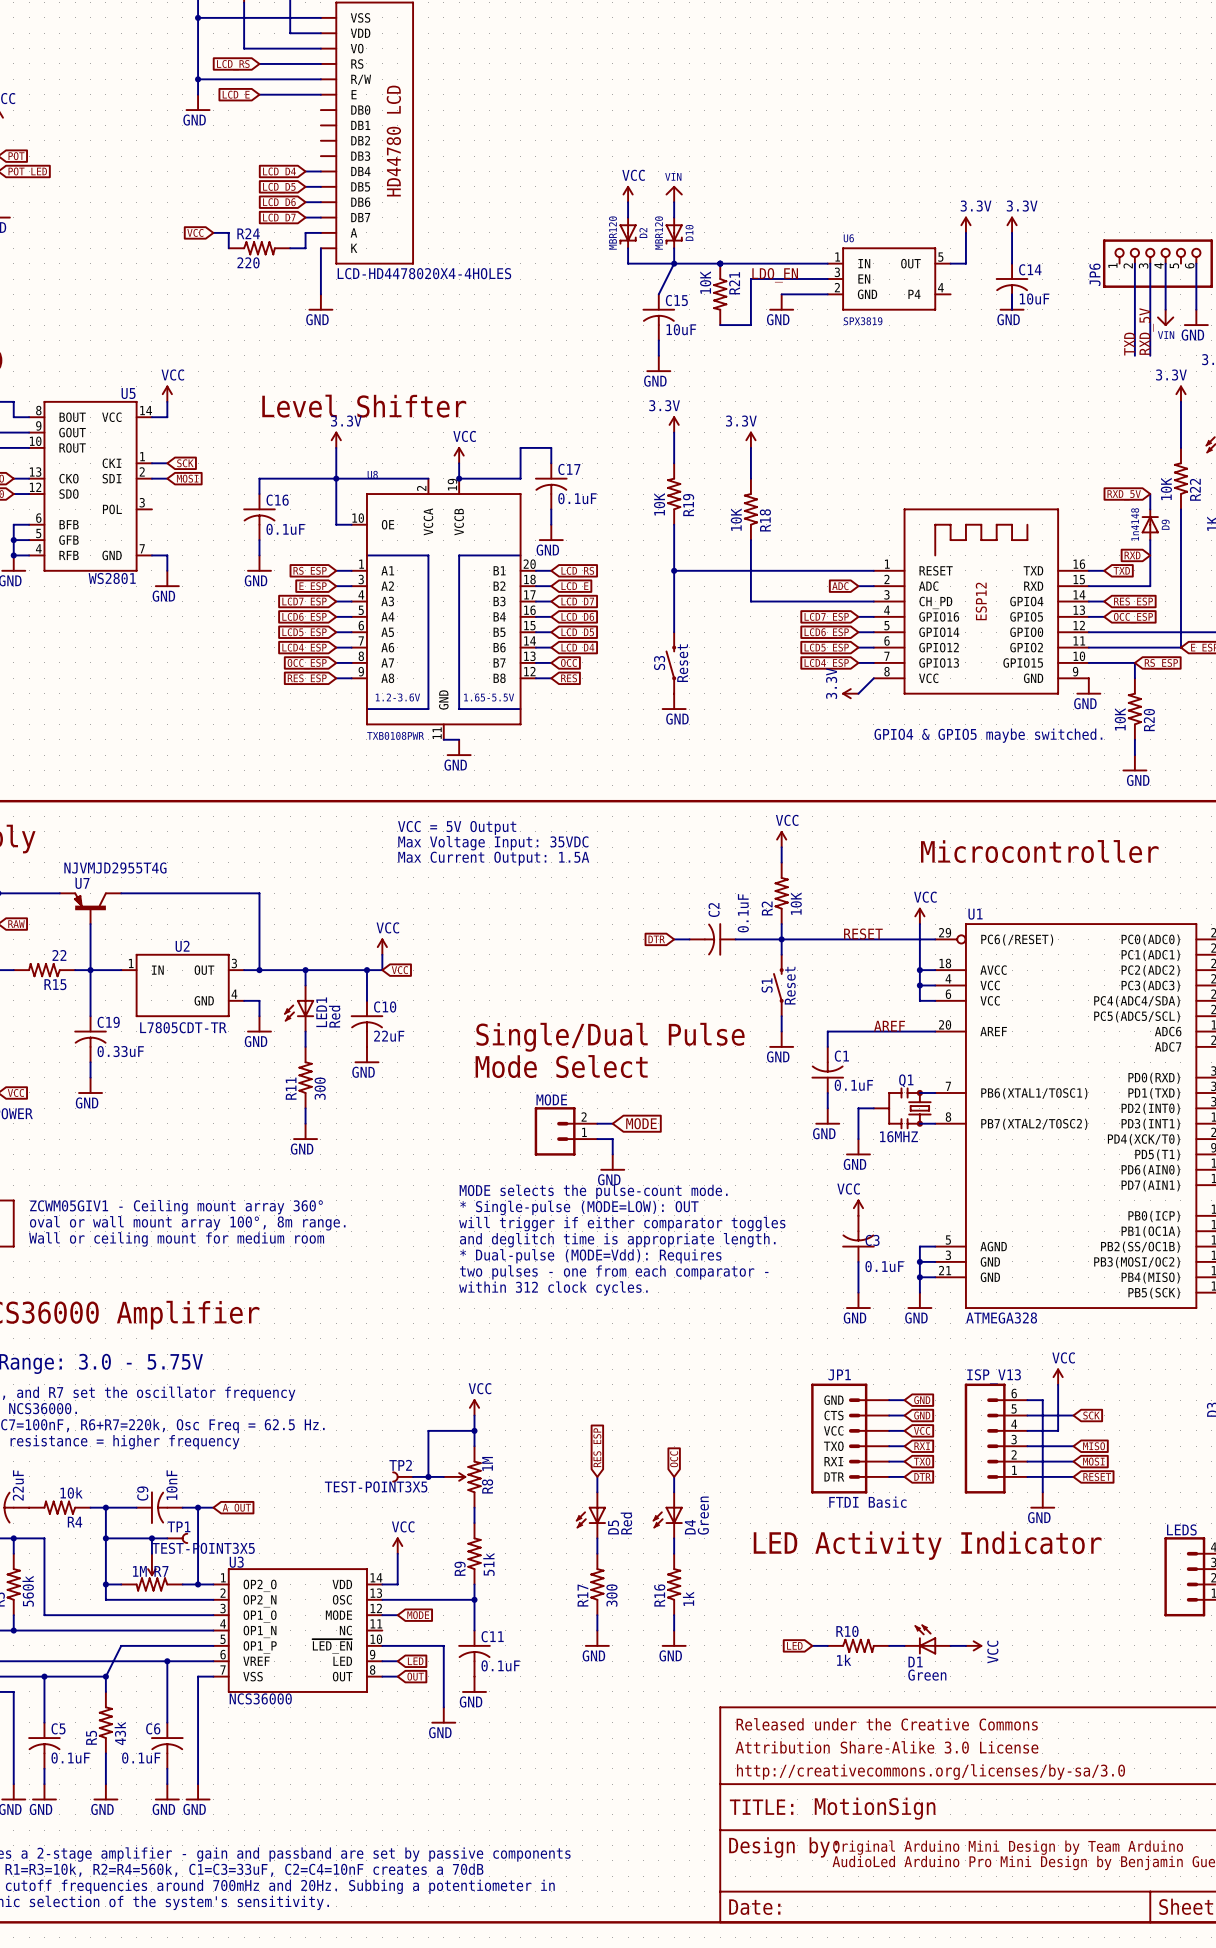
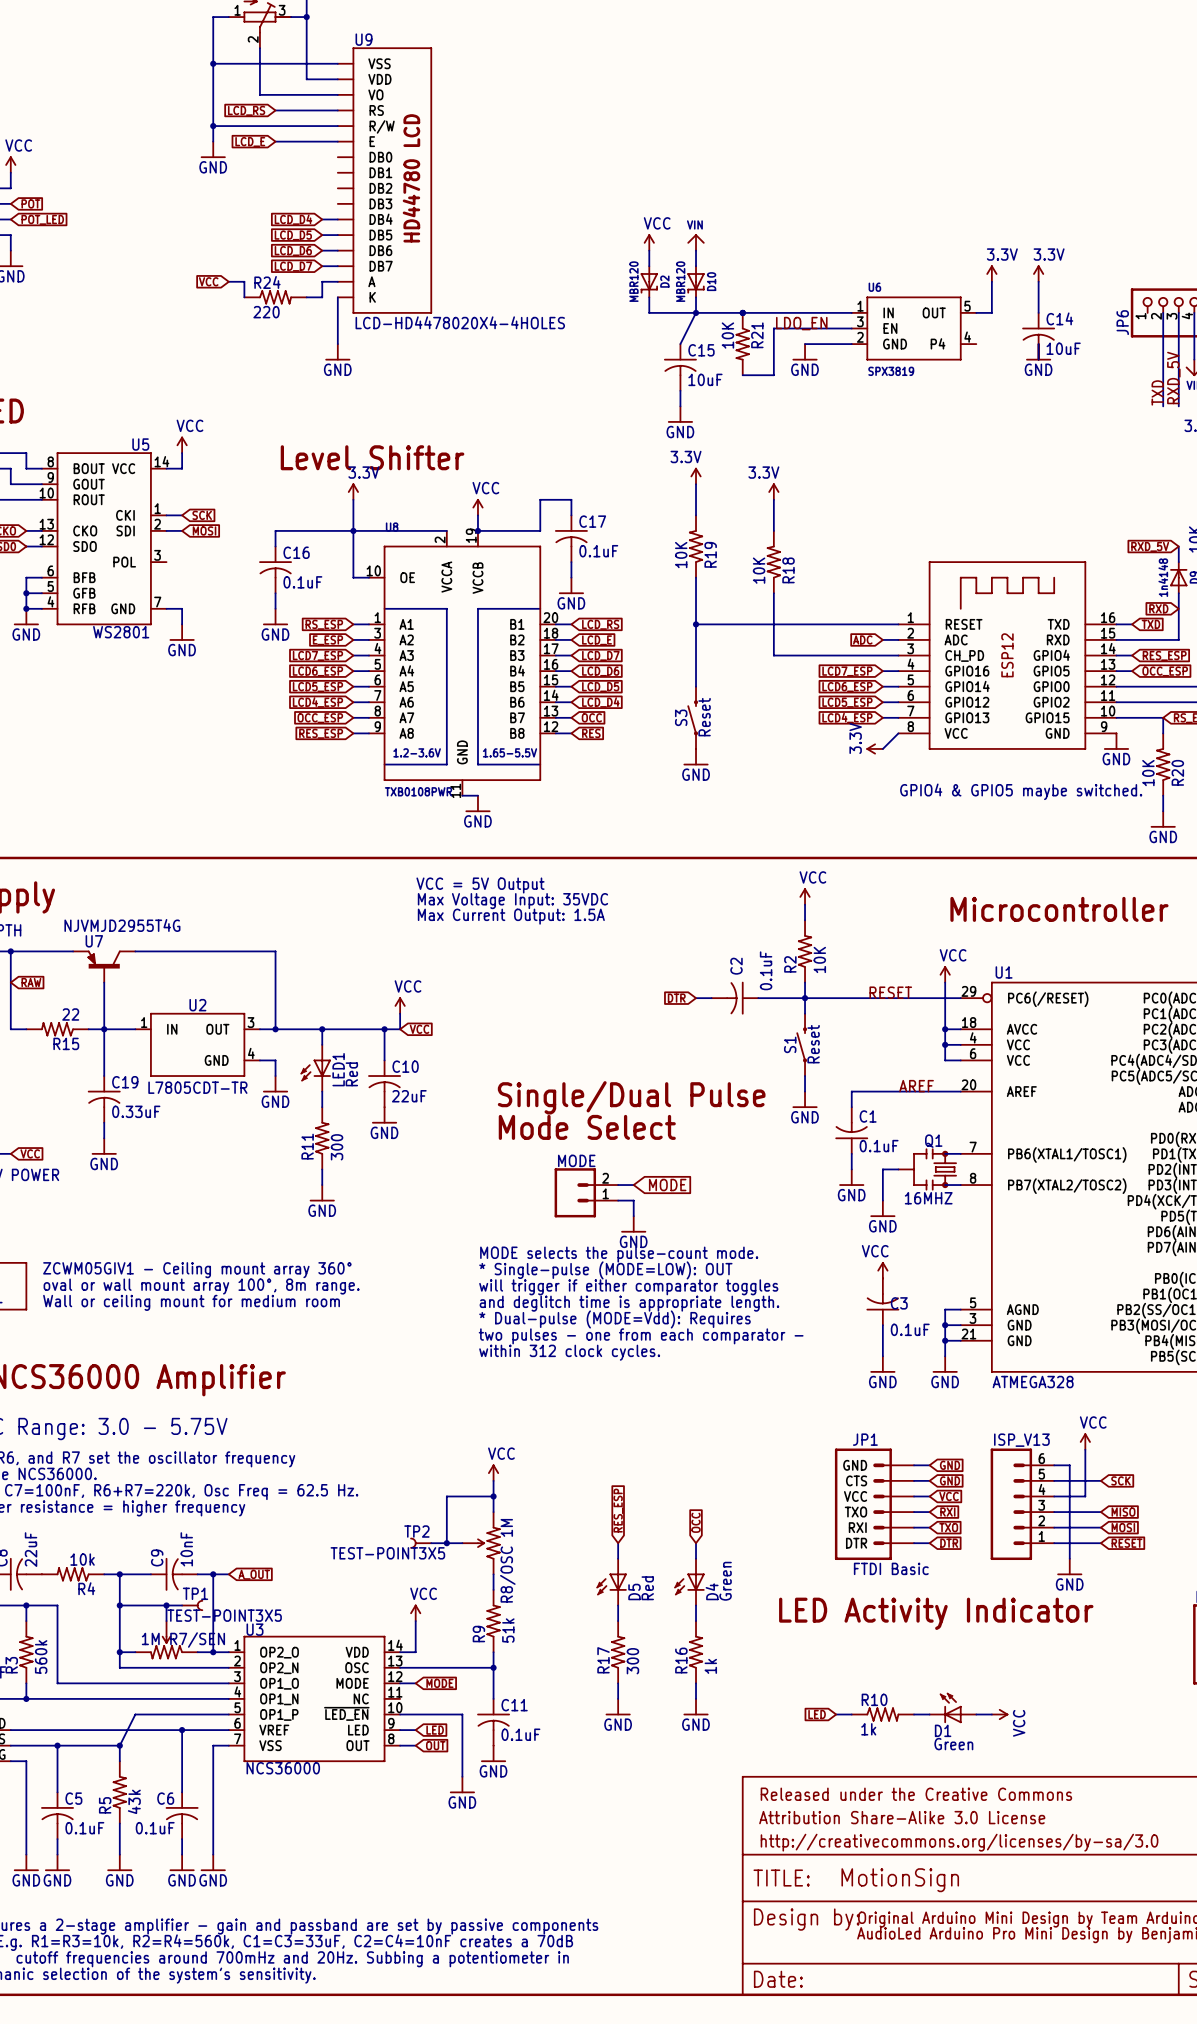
R8 name: R8 (487, 1486) -> R8/OSC (507, 1574)
R7 name: R7 (161, 1571) -> R7/SEN (197, 1640)

